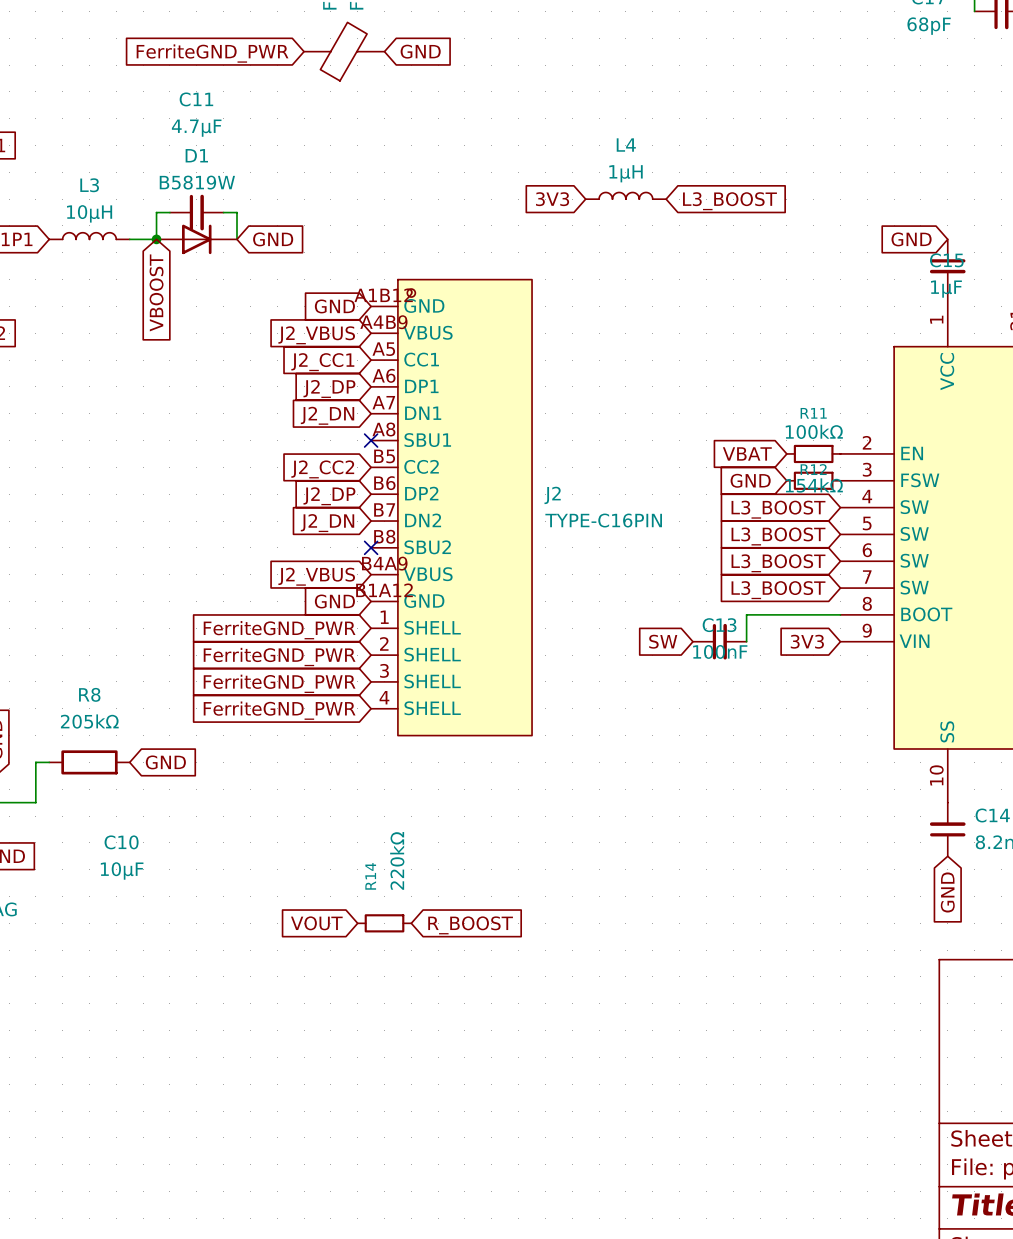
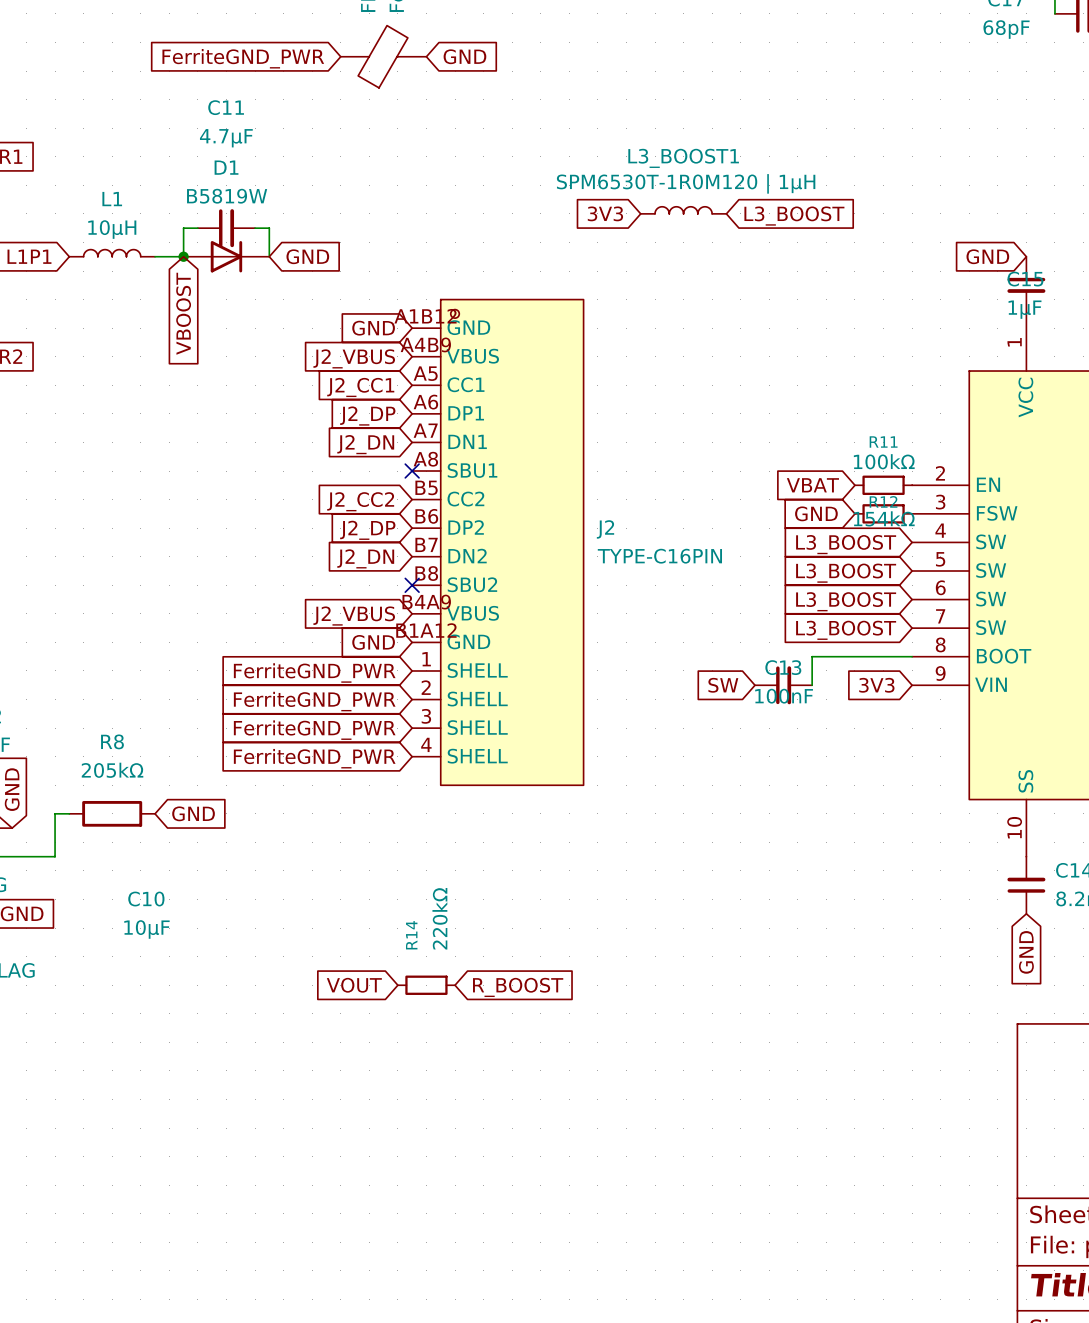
L4 name: L4 (626, 145) -> L3_BOOST1 (683, 158)
L4 value: 1µH (626, 173) -> SPM6530T-1R0M120 | 1µH (686, 183)
L3 name: L3 (89, 185) -> L1 (112, 199)

